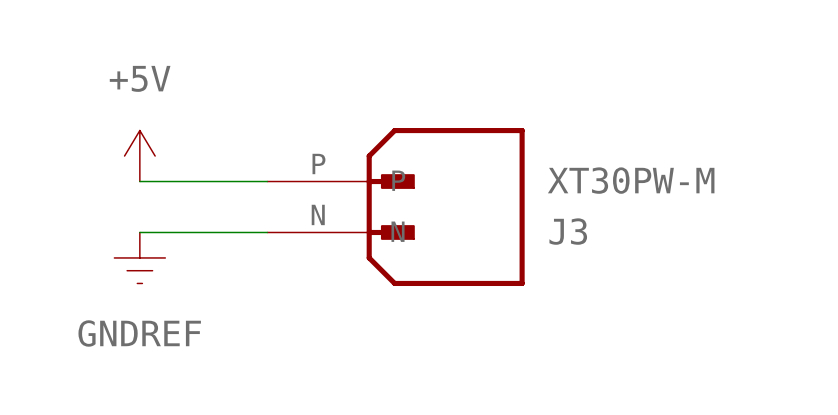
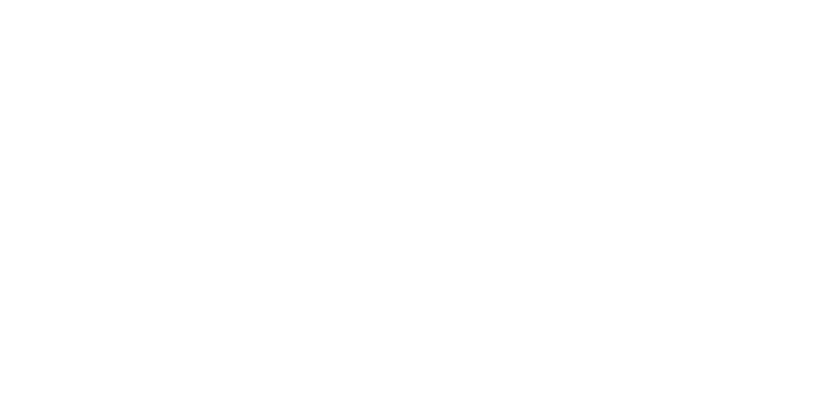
power symbol: +5V (139, 156) -> none
wire: (139, 181) (267, 181) -> none
J3: XT30PW-M (395, 207) -> none
wire: (139, 232) (267, 232) -> none
power symbol: GNDREF (139, 257) -> none

